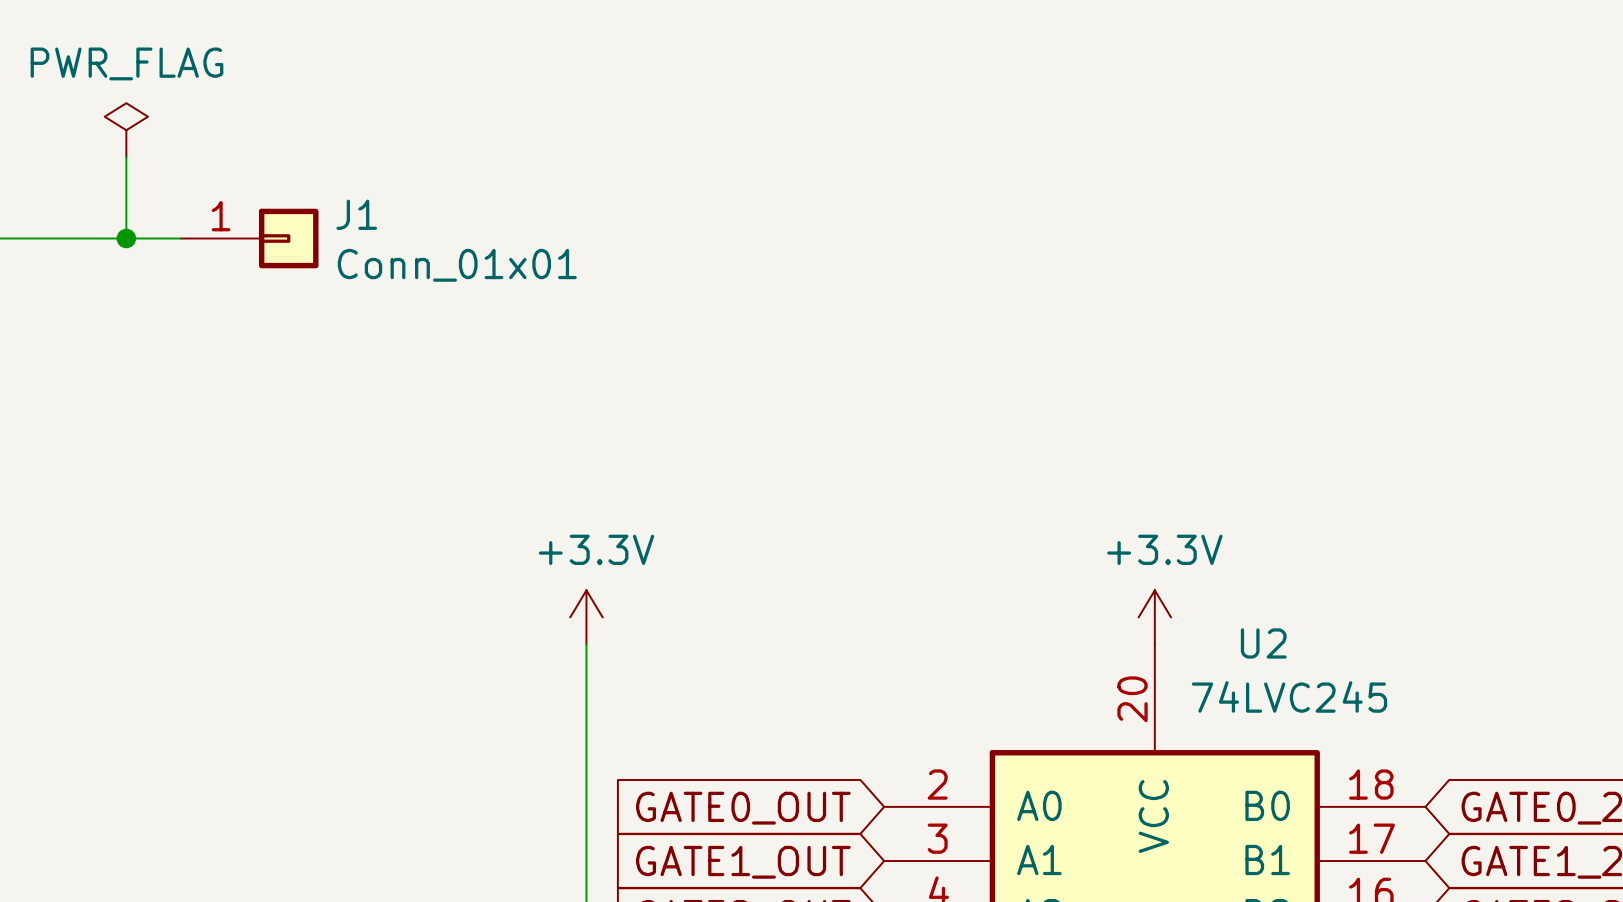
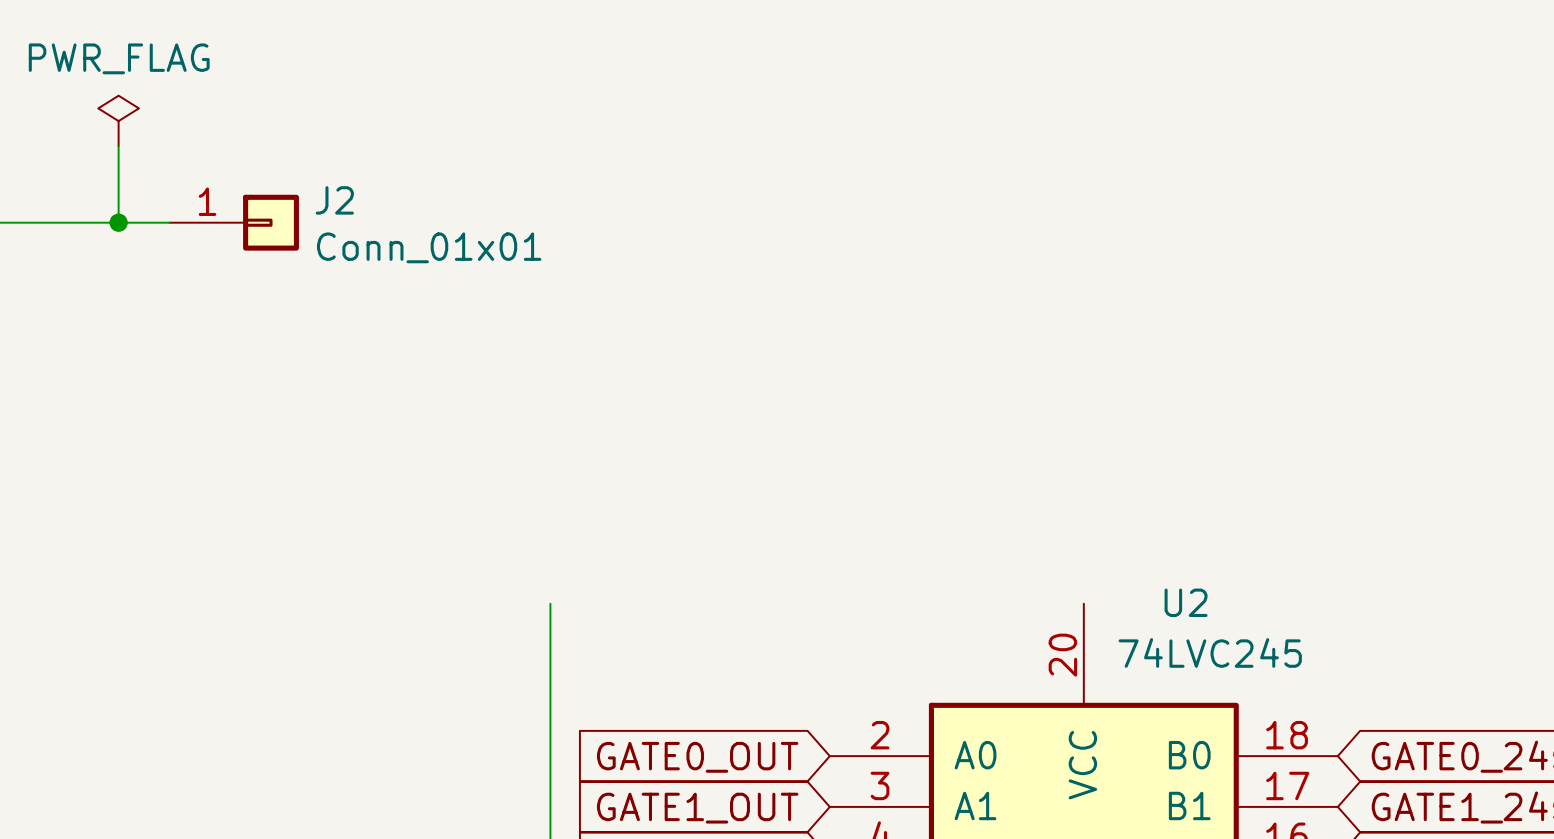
J1 name: J1 (356, 214) -> J2 (334, 200)
power symbol: +3.3V (586, 617) -> none
power symbol: +3.3V (1154, 617) -> none

